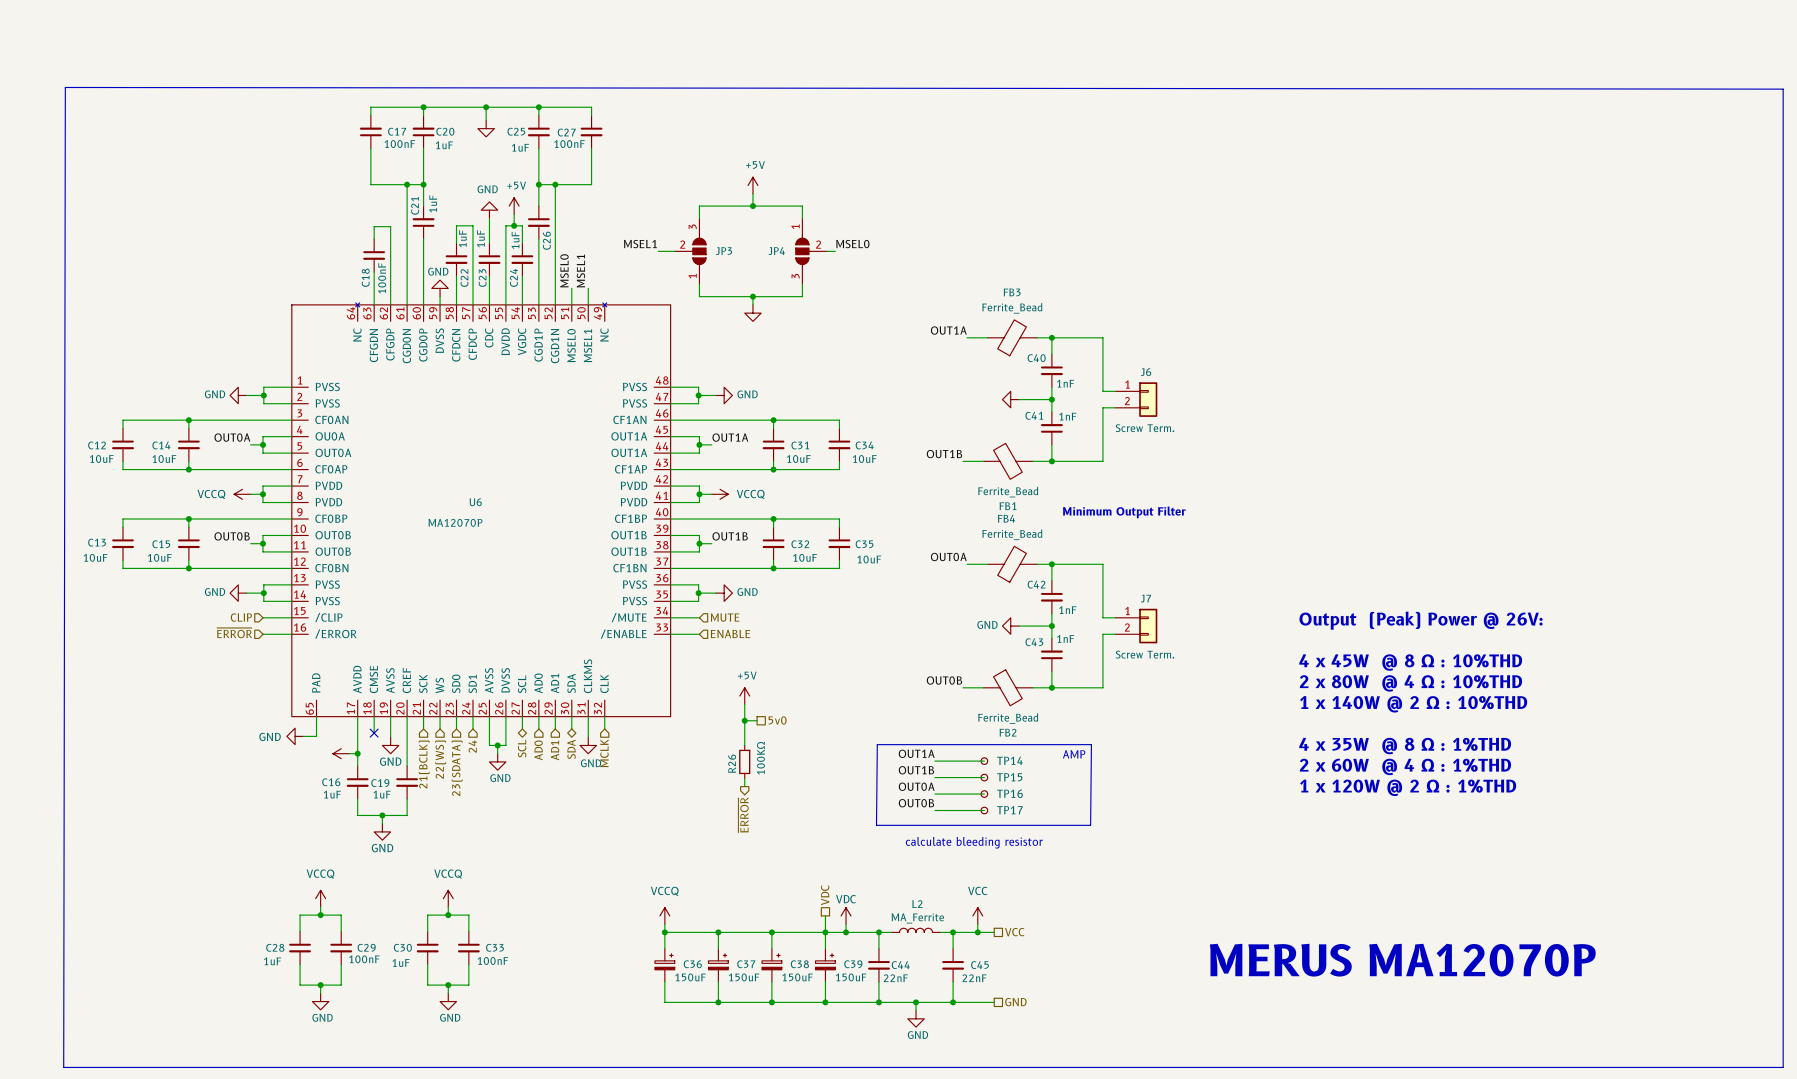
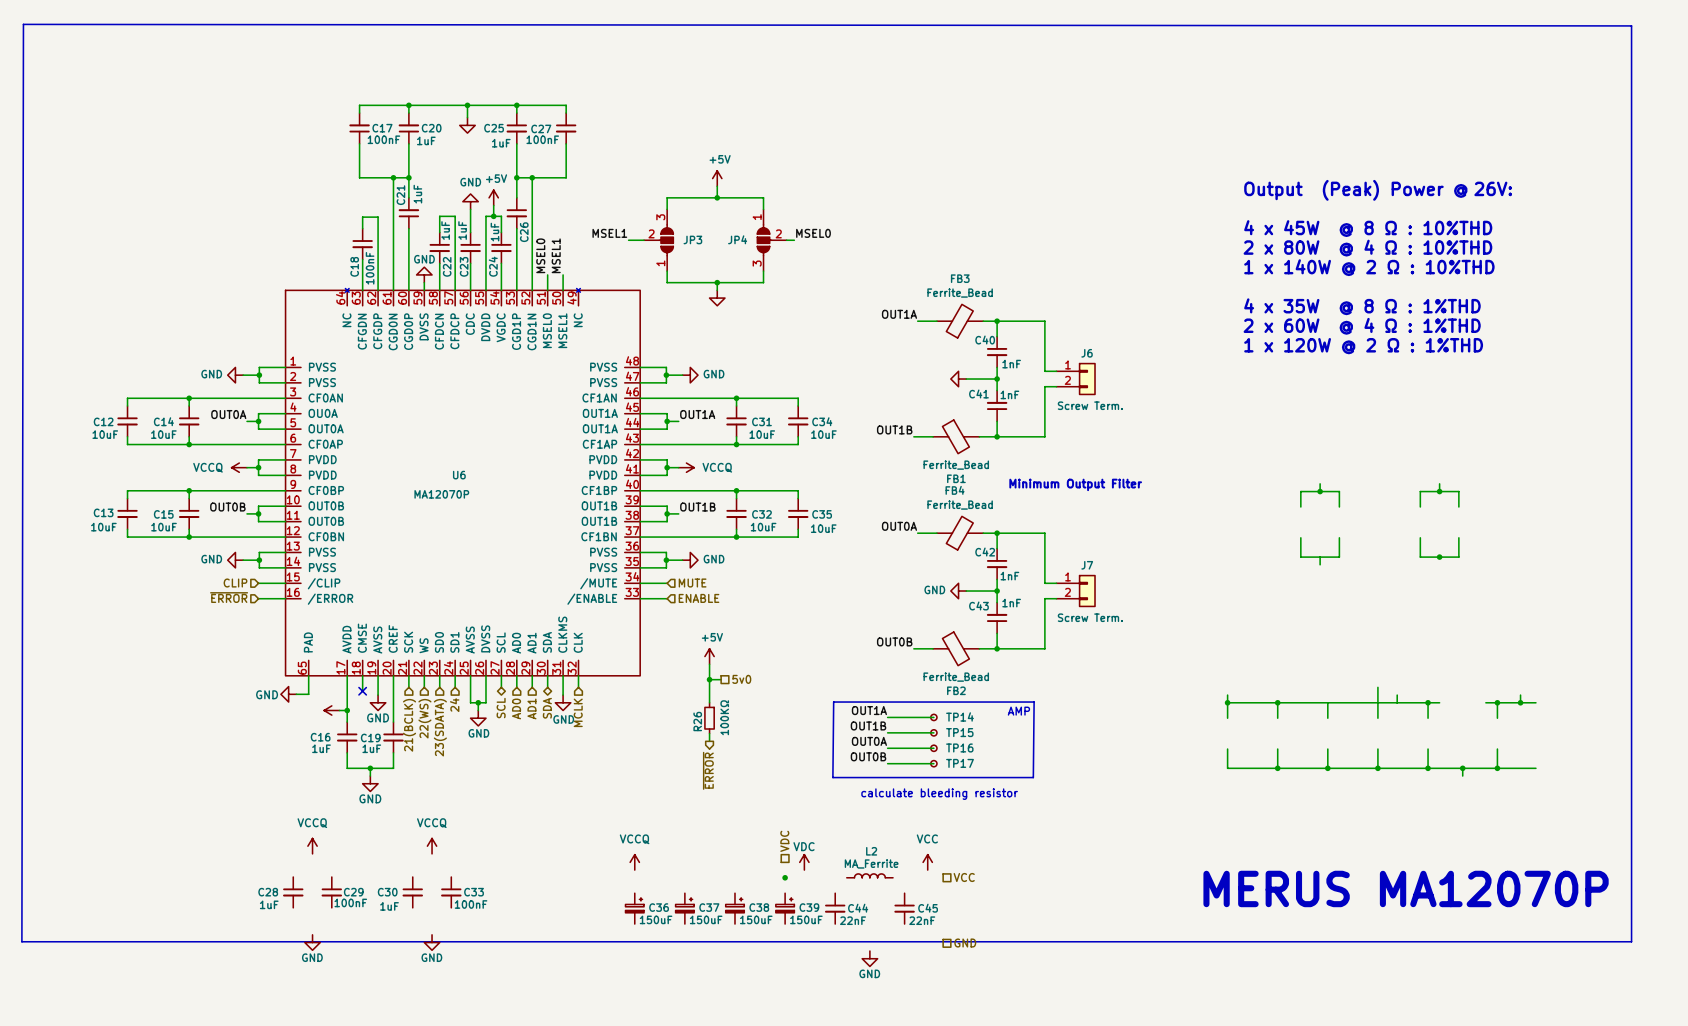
line: (65, 87) (63, 1067) (1783, 1067) (1783, 89) (65, 87) -> (23, 24) (21, 941) (1631, 941) (1631, 25) (23, 24)
text: none -> Output (Peak) Power @ 26V: (1378, 190)
text: none -> 4 x 45W @ 8 Ω : 10%THD (1368, 228)
text: none -> 2 x 80W @ 4 Ω : 10%THD (1367, 248)
text: none -> 1 x 140W @ 2 Ω : 10%THD (1369, 267)
text: none -> 4 x 35W @ 8 Ω : 1%THD (1362, 306)
text: none -> 2 x 60W @ 4 Ω : 1%THD (1362, 326)
text: none -> 1 x 120W @ 2 Ω : 1%THD (1363, 346)
wire: none -> (1320, 483) (1320, 491)
wire: none -> (1439, 483) (1439, 491)
junction: none -> (1320, 491)
junction: none -> (1439, 491)
wire: none -> (1300, 506) (1300, 491) (1339, 491) (1339, 506)
wire: none -> (1420, 506) (1420, 491) (1458, 491) (1458, 506)
wire: none -> (1300, 537) (1300, 557) (1339, 557) (1339, 537)
wire: none -> (1420, 537) (1420, 557) (1458, 557) (1458, 537)
wire: none -> (1320, 557) (1320, 564)
junction: none -> (1439, 557)
text: Output (Peak) Power @ 26V: (1421, 620) -> none
text: 4 x 45W @ 8 Ω : 10%THD (1410, 662) -> none
text: 2 x 80W @ 4 Ω : 10%THD (1410, 683) -> none
text: 1 x 140W @ 2 Ω : 10%THD (1413, 704) -> none
wire: none -> (1377, 687) (1377, 718)
wire: none -> (1227, 695) (1227, 718)
wire: none -> (1397, 695) (1397, 702)
wire: none -> (1520, 695) (1520, 702)
wire: none -> (1227, 702) (1439, 702)
junction: none -> (1227, 702)
wire: none -> (1277, 702) (1277, 718)
junction: none -> (1277, 702)
wire: none -> (1327, 702) (1327, 718)
wire: none -> (1428, 702) (1428, 718)
junction: none -> (1428, 702)
wire: none -> (1485, 702) (1535, 702)
wire: none -> (1497, 702) (1497, 718)
junction: none -> (1497, 702)
junction: none -> (1520, 702)
text: 4 x 35W @ 8 Ω : 1%THD (1405, 746) -> none
text: 2 x 60W @ 4 Ω : 1%THD (1405, 766) -> none
text: 1 x 120W @ 2 Ω : 1%THD (1408, 787) -> none
wire: none -> (1227, 749) (1227, 768) (1535, 768)
wire: none -> (1277, 749) (1277, 768)
wire: none -> (1327, 749) (1327, 768)
wire: none -> (1377, 749) (1377, 768)
wire: none -> (1428, 749) (1428, 768)
wire: none -> (1497, 749) (1497, 768)
junction: none -> (1277, 768)
junction: none -> (1327, 768)
junction: none -> (1377, 768)
junction: none -> (1428, 768)
wire: none -> (1462, 768) (1462, 776)
junction: none -> (1462, 768)
junction: none -> (1497, 768)
wire: (320, 906) (320, 915) -> none
wire: (448, 906) (448, 915) -> none
junction: (320, 915) -> none
junction: (448, 915) -> none
wire: (825, 915) (825, 948) -> none
wire: (664, 924) (664, 948) -> none
wire: (846, 924) (846, 932) -> none
wire: (977, 924) (977, 932) -> none
wire: (300, 931) (300, 915) (341, 915) (341, 931) -> none
wire: (427, 931) (427, 915) (468, 915) (468, 931) -> none
wire: (664, 932) (891, 932) -> none
junction: (664, 932) -> none
wire: (718, 932) (718, 948) -> none
junction: (718, 932) -> none
wire: (771, 932) (771, 948) -> none
junction: (771, 932) -> none
junction: (846, 932) -> none
wire: (878, 932) (878, 948) -> none
junction: (878, 932) -> none
wire: (940, 932) (994, 932) -> none
wire: (953, 932) (953, 948) -> none
junction: (953, 932) -> none
junction: (977, 932) -> none
text position: MERUS MA12070P (1402, 960) -> MERUS MA12070P (1406, 888)
wire: (300, 964) (300, 985) (341, 985) (341, 964) -> none
wire: (427, 964) (427, 985) (468, 985) (468, 964) -> none
wire: (664, 981) (664, 1002) (994, 1002) -> none
wire: (718, 981) (718, 1002) -> none
wire: (771, 981) (771, 1002) -> none
wire: (825, 981) (825, 1002) -> none
wire: (878, 981) (878, 1002) -> none
wire: (953, 981) (953, 1002) -> none
wire: (320, 985) (320, 993) -> none
junction: (320, 985) -> none
wire: (448, 985) (448, 993) -> none
junction: (448, 985) -> none
junction: (718, 1002) -> none
junction: (771, 1002) -> none
junction: (825, 1002) -> none
junction: (878, 1002) -> none
wire: (916, 1002) (916, 1010) -> none
junction: (916, 1002) -> none
junction: (953, 1002) -> none

